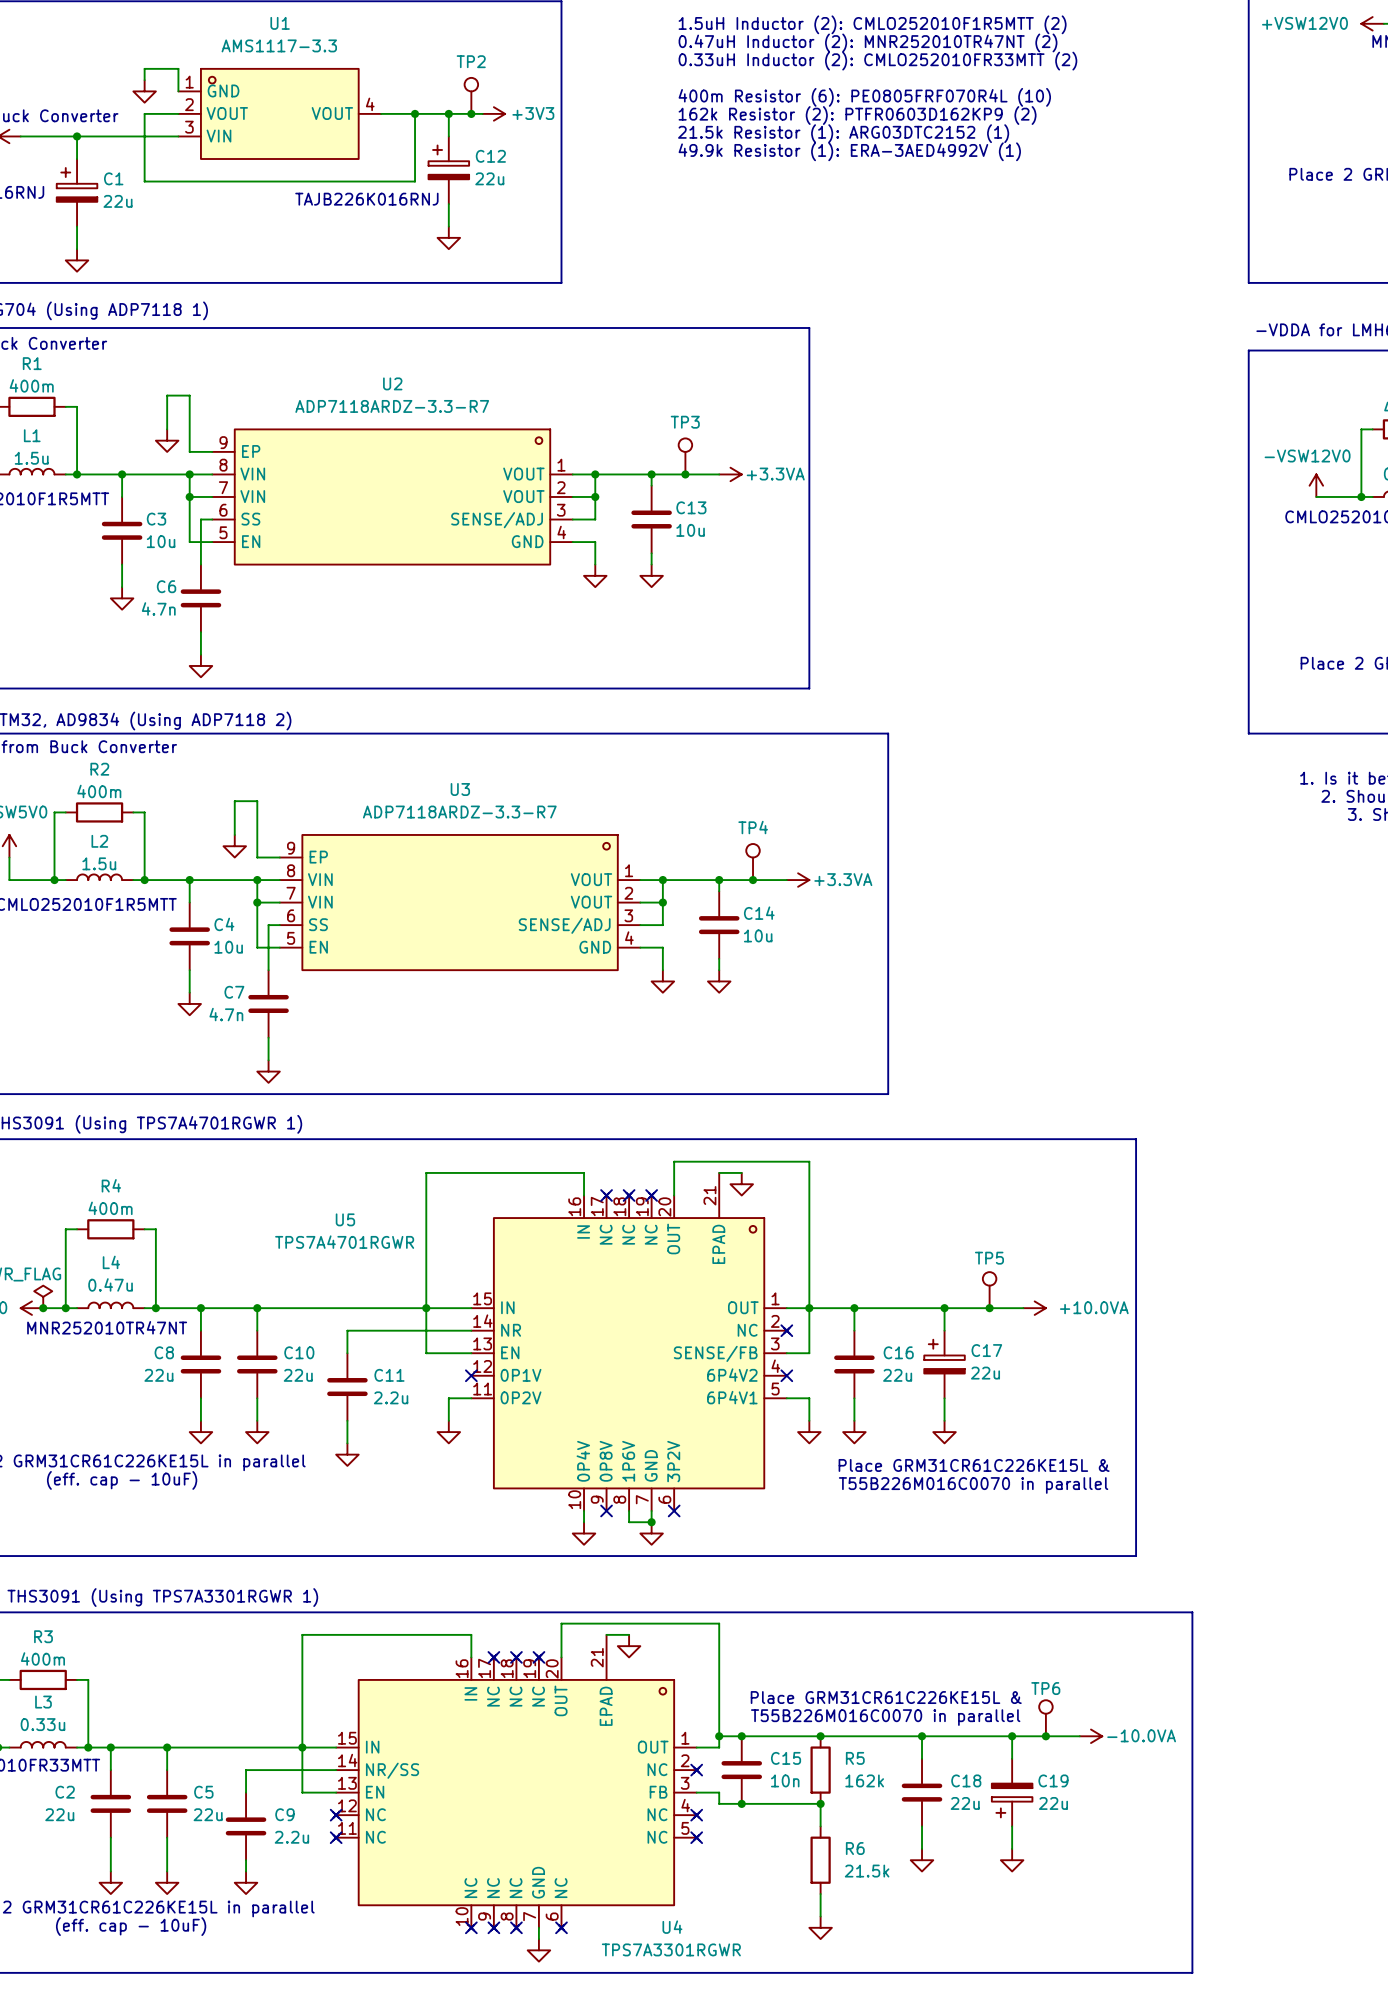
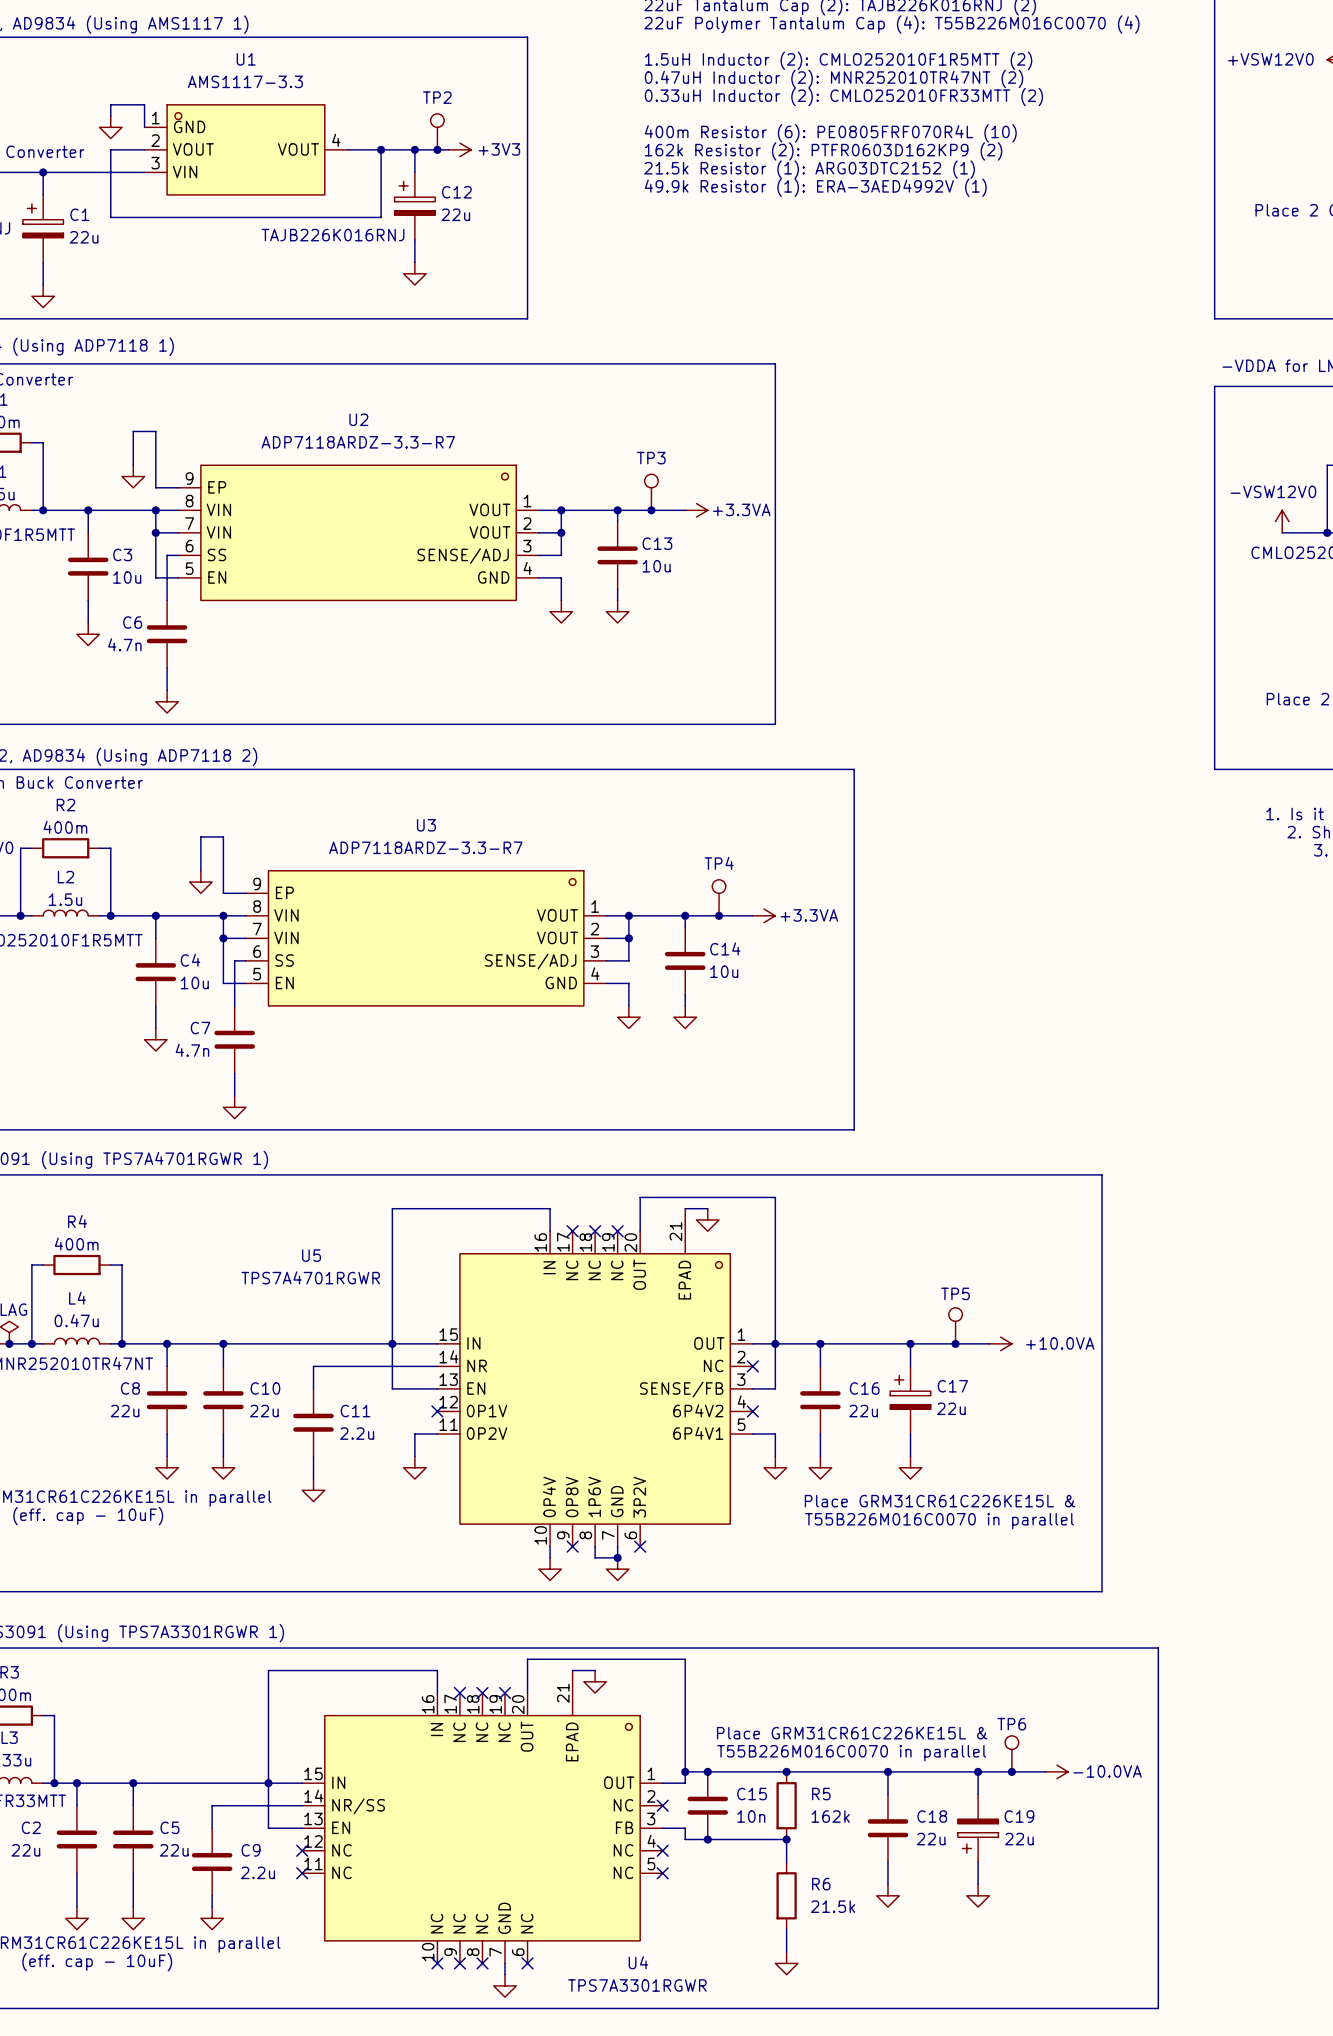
U5 symbol: [471, 1172, 790, 1511] -> [437, 1208, 753, 1547]
U4 symbol: [333, 1634, 700, 1931] -> [302, 1670, 663, 1964]

